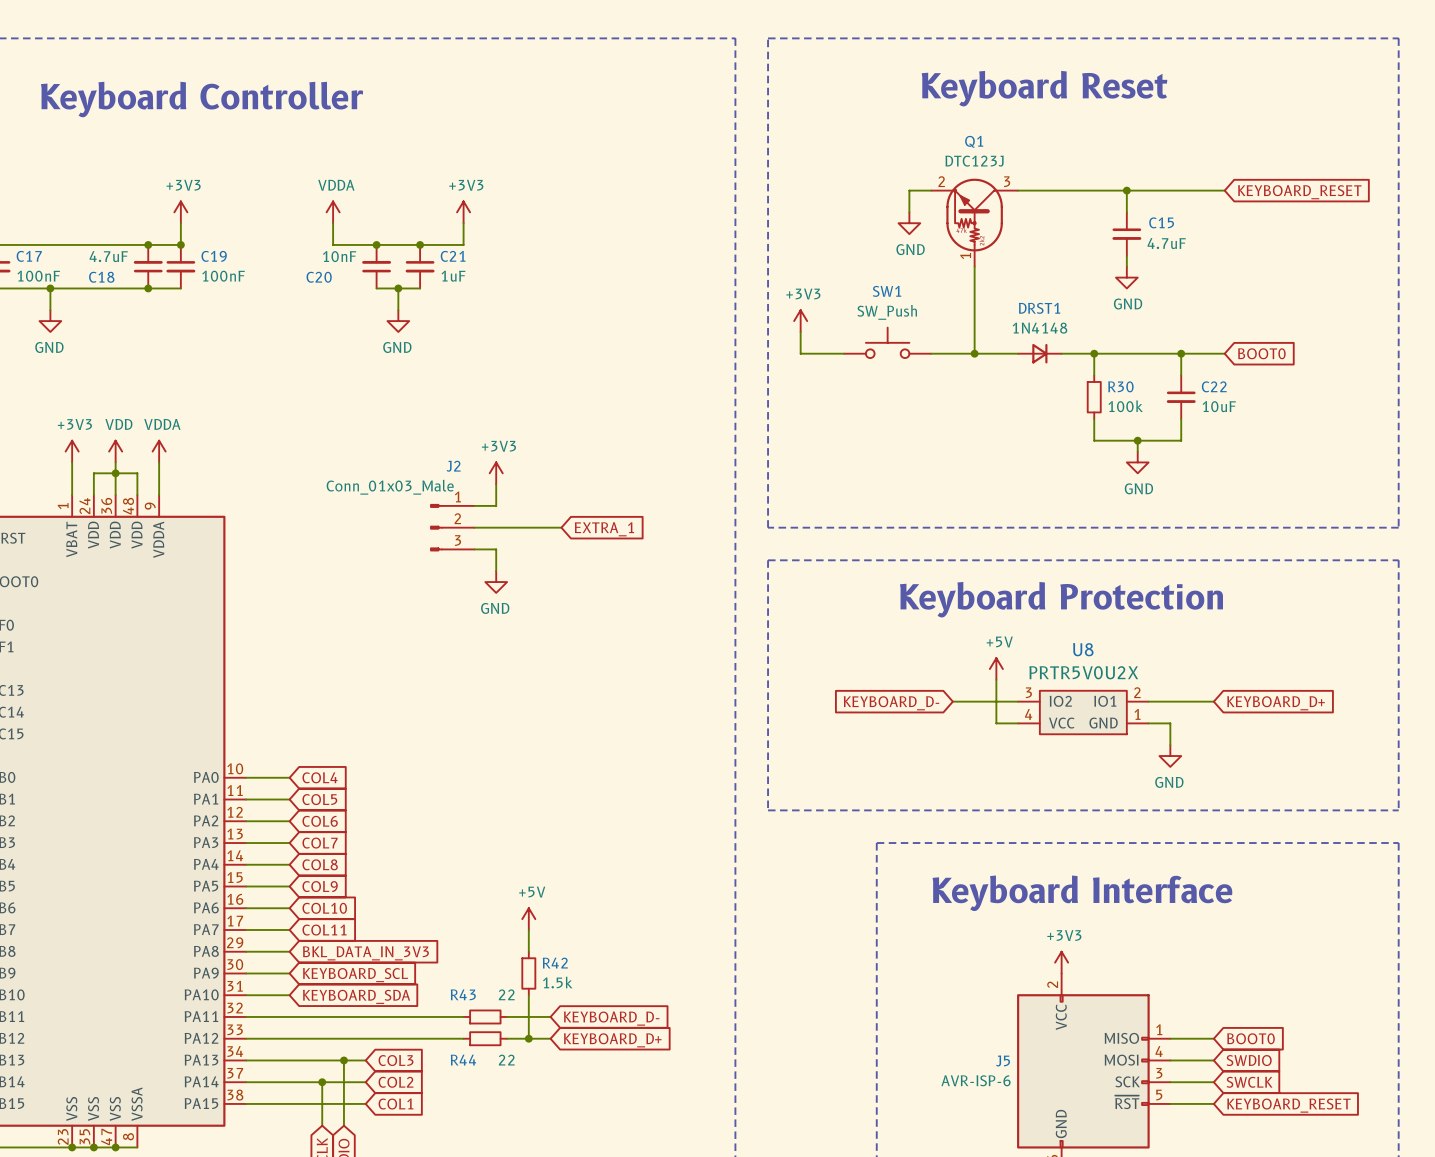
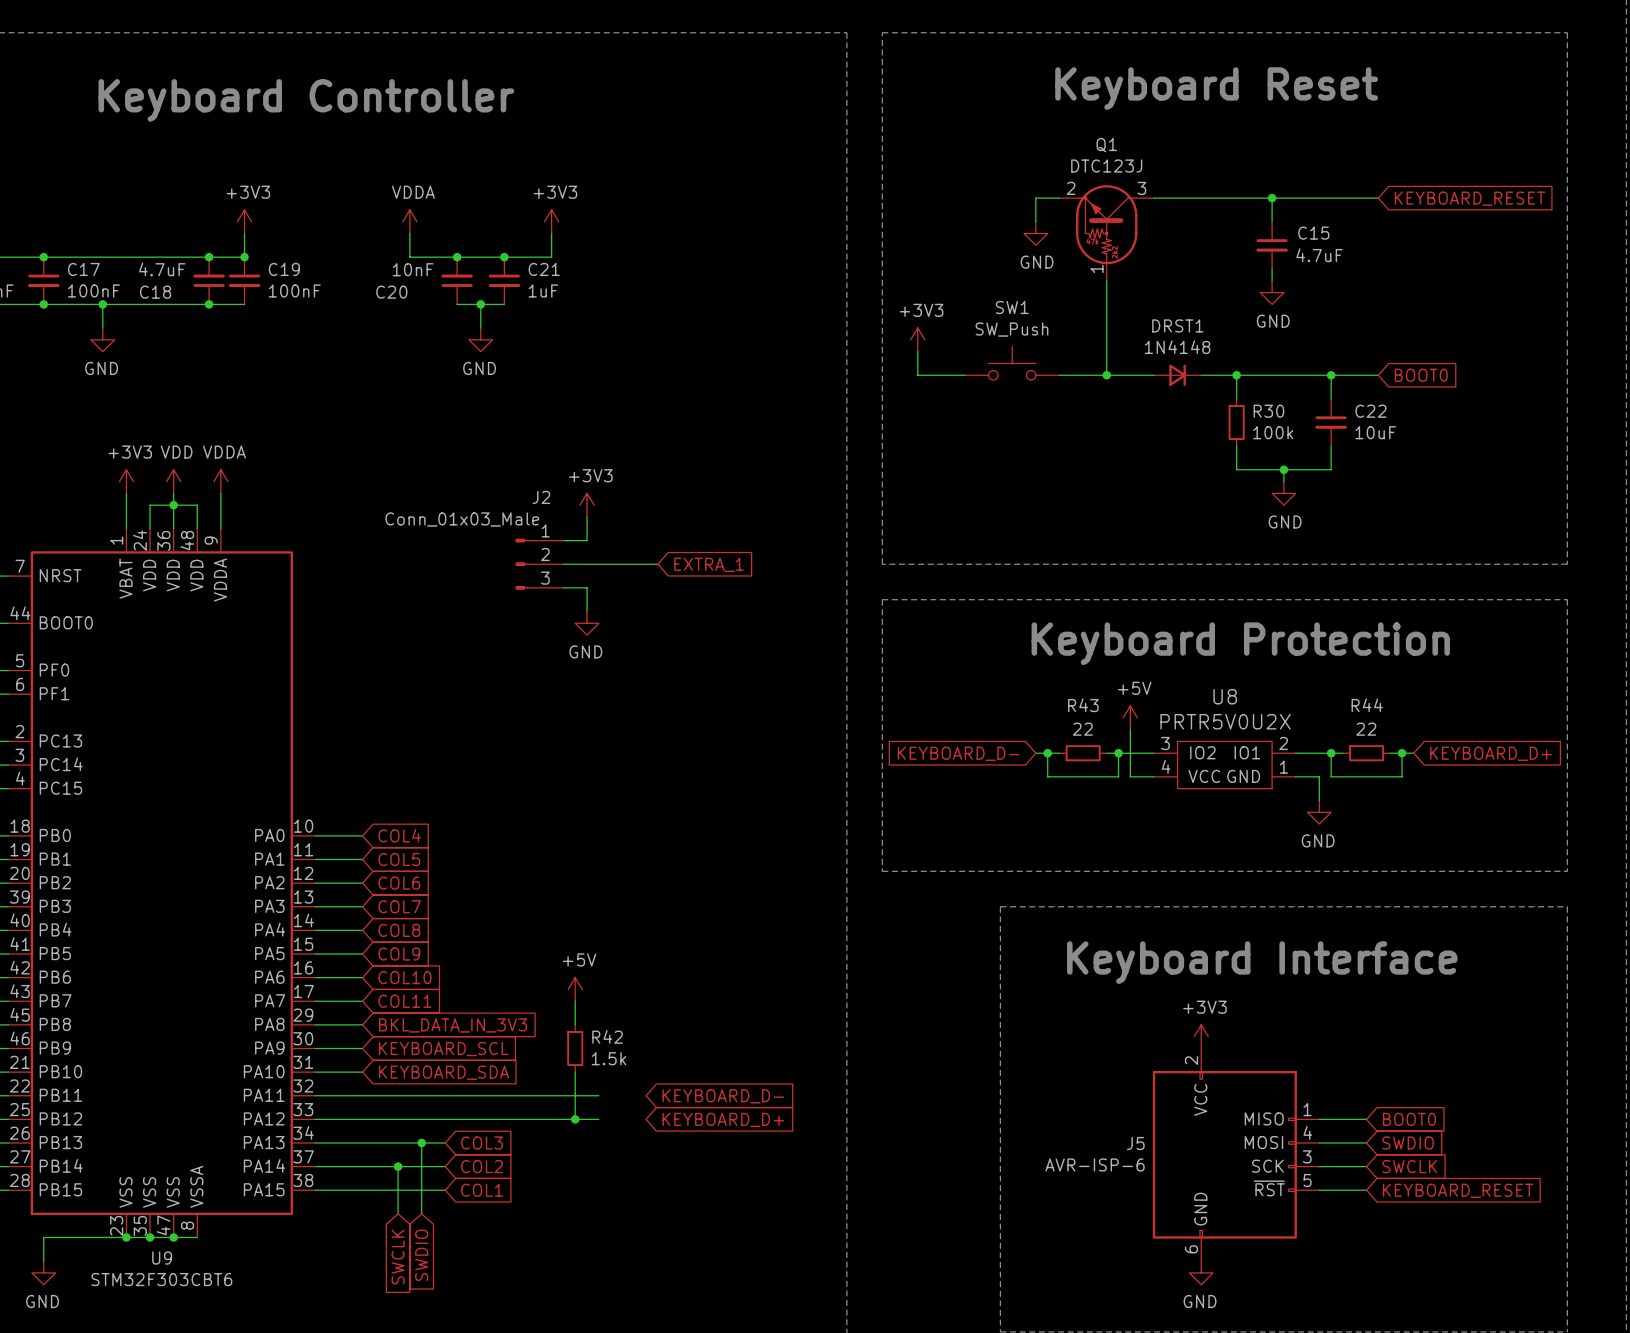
wire: none -> (1047, 753) (1047, 776) (1118, 776) (1118, 753)
junction: none -> (1047, 753)
wire: (952, 701) (974, 701) -> (1035, 753) (1059, 753)
junction: none -> (1118, 753)
wire: none -> (1331, 753) (1331, 776) (1402, 776) (1402, 753)
junction: none -> (1331, 753)
wire: (1192, 701) (1213, 701) -> (1390, 753) (1413, 753)
junction: none -> (1402, 753)
global label position: KEYBOARD_D- (891, 703) -> KEYBOARD_D- (958, 753)
global label position: KEYBOARD_D+ (1276, 703) -> KEYBOARD_D+ (1491, 753)
power symbol position: +5V (528, 919) -> +5V (575, 989)
wire: (528, 929) (528, 951) -> (575, 1001) (575, 1024)
R42 position: (528, 973) -> (575, 1048)
R43 name position: R43 (463, 994) -> R43 (1083, 705)
R43 value position: 22 (506, 994) -> 22 (1082, 729)
wire: (528, 995) (528, 1038) -> (575, 1072) (575, 1119)
R43 position: (485, 1016) -> (1083, 753)
wire: (507, 1016) (550, 1016) -> (598, 1095) (551, 1095)
R44 position: (485, 1038) -> (1366, 753)
wire: (507, 1038) (550, 1038) -> (598, 1119) (551, 1119)
junction position: (528, 1038) -> (575, 1119)
R44 name position: R44 (463, 1060) -> R44 (1367, 705)
R44 value position: 22 (506, 1060) -> 22 (1366, 729)

